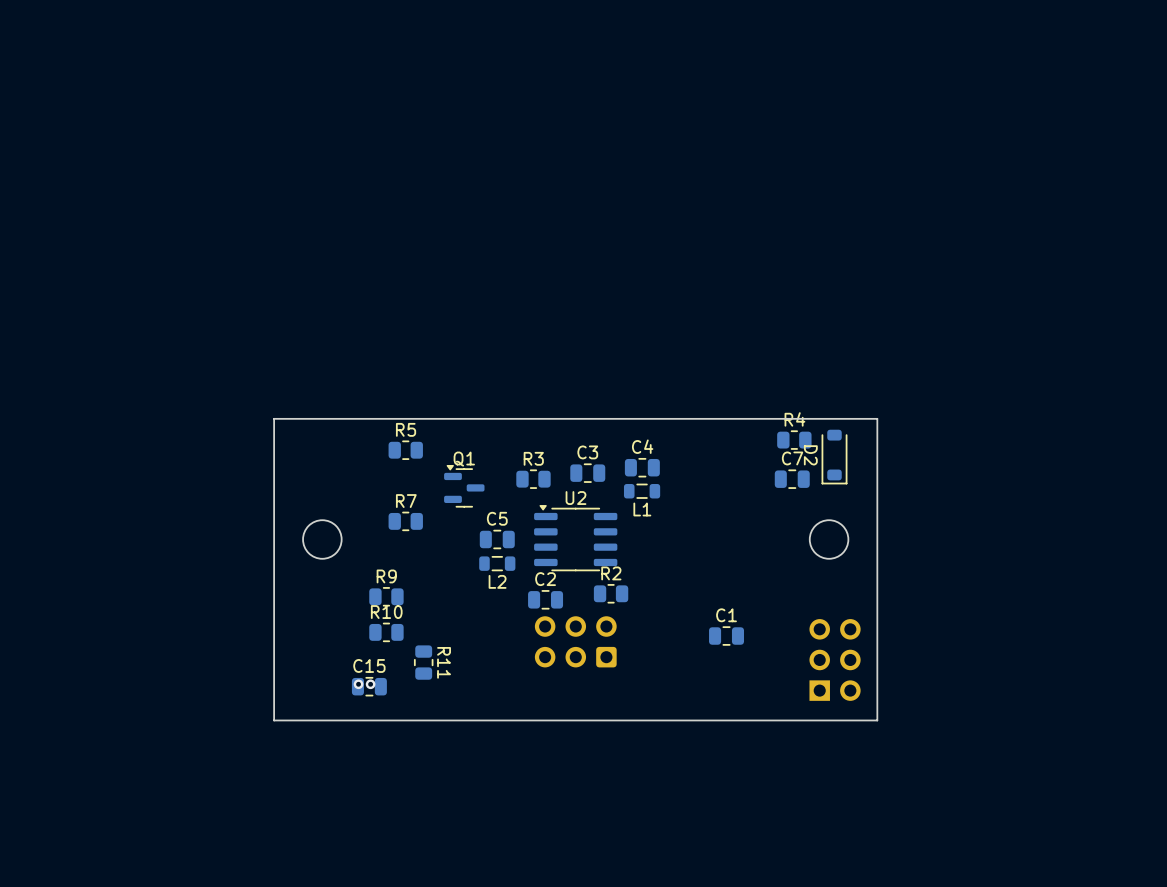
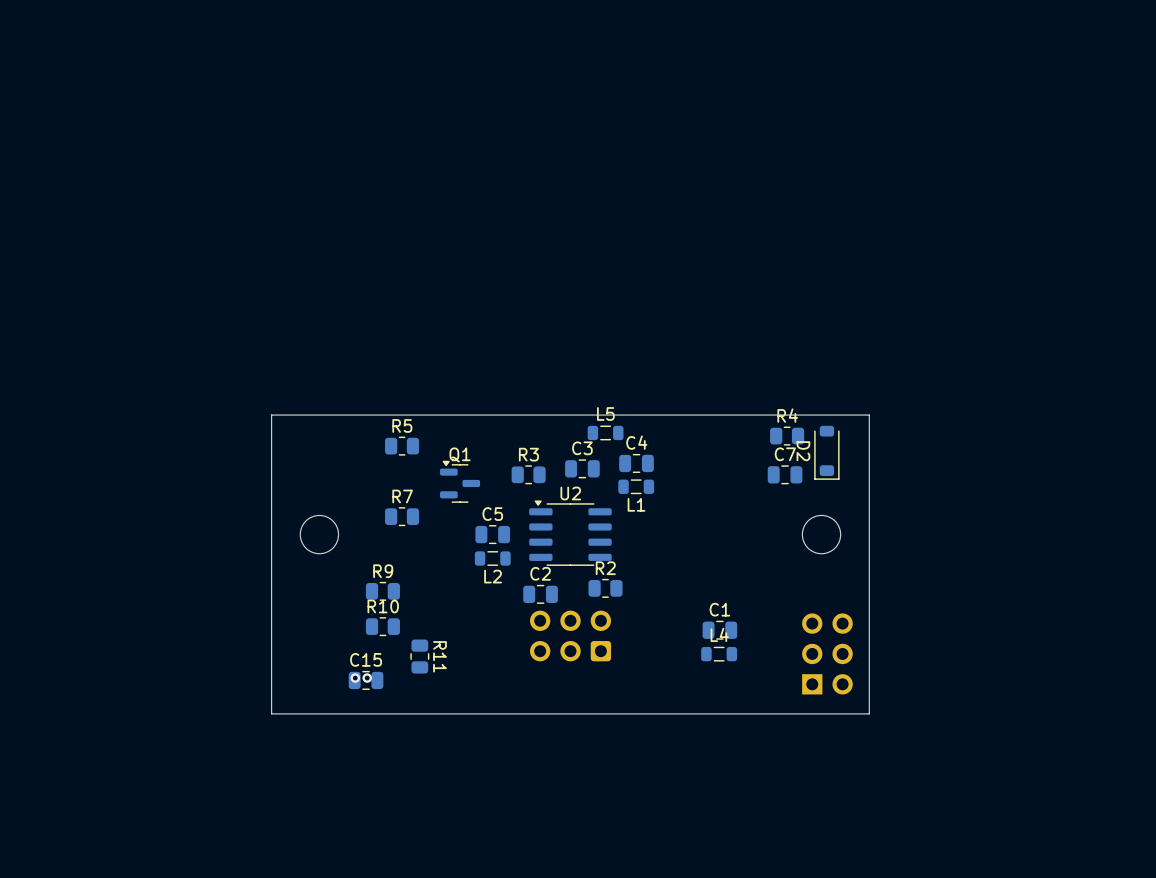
L5: none -> (605, 432)
L4: none -> (719, 654)

